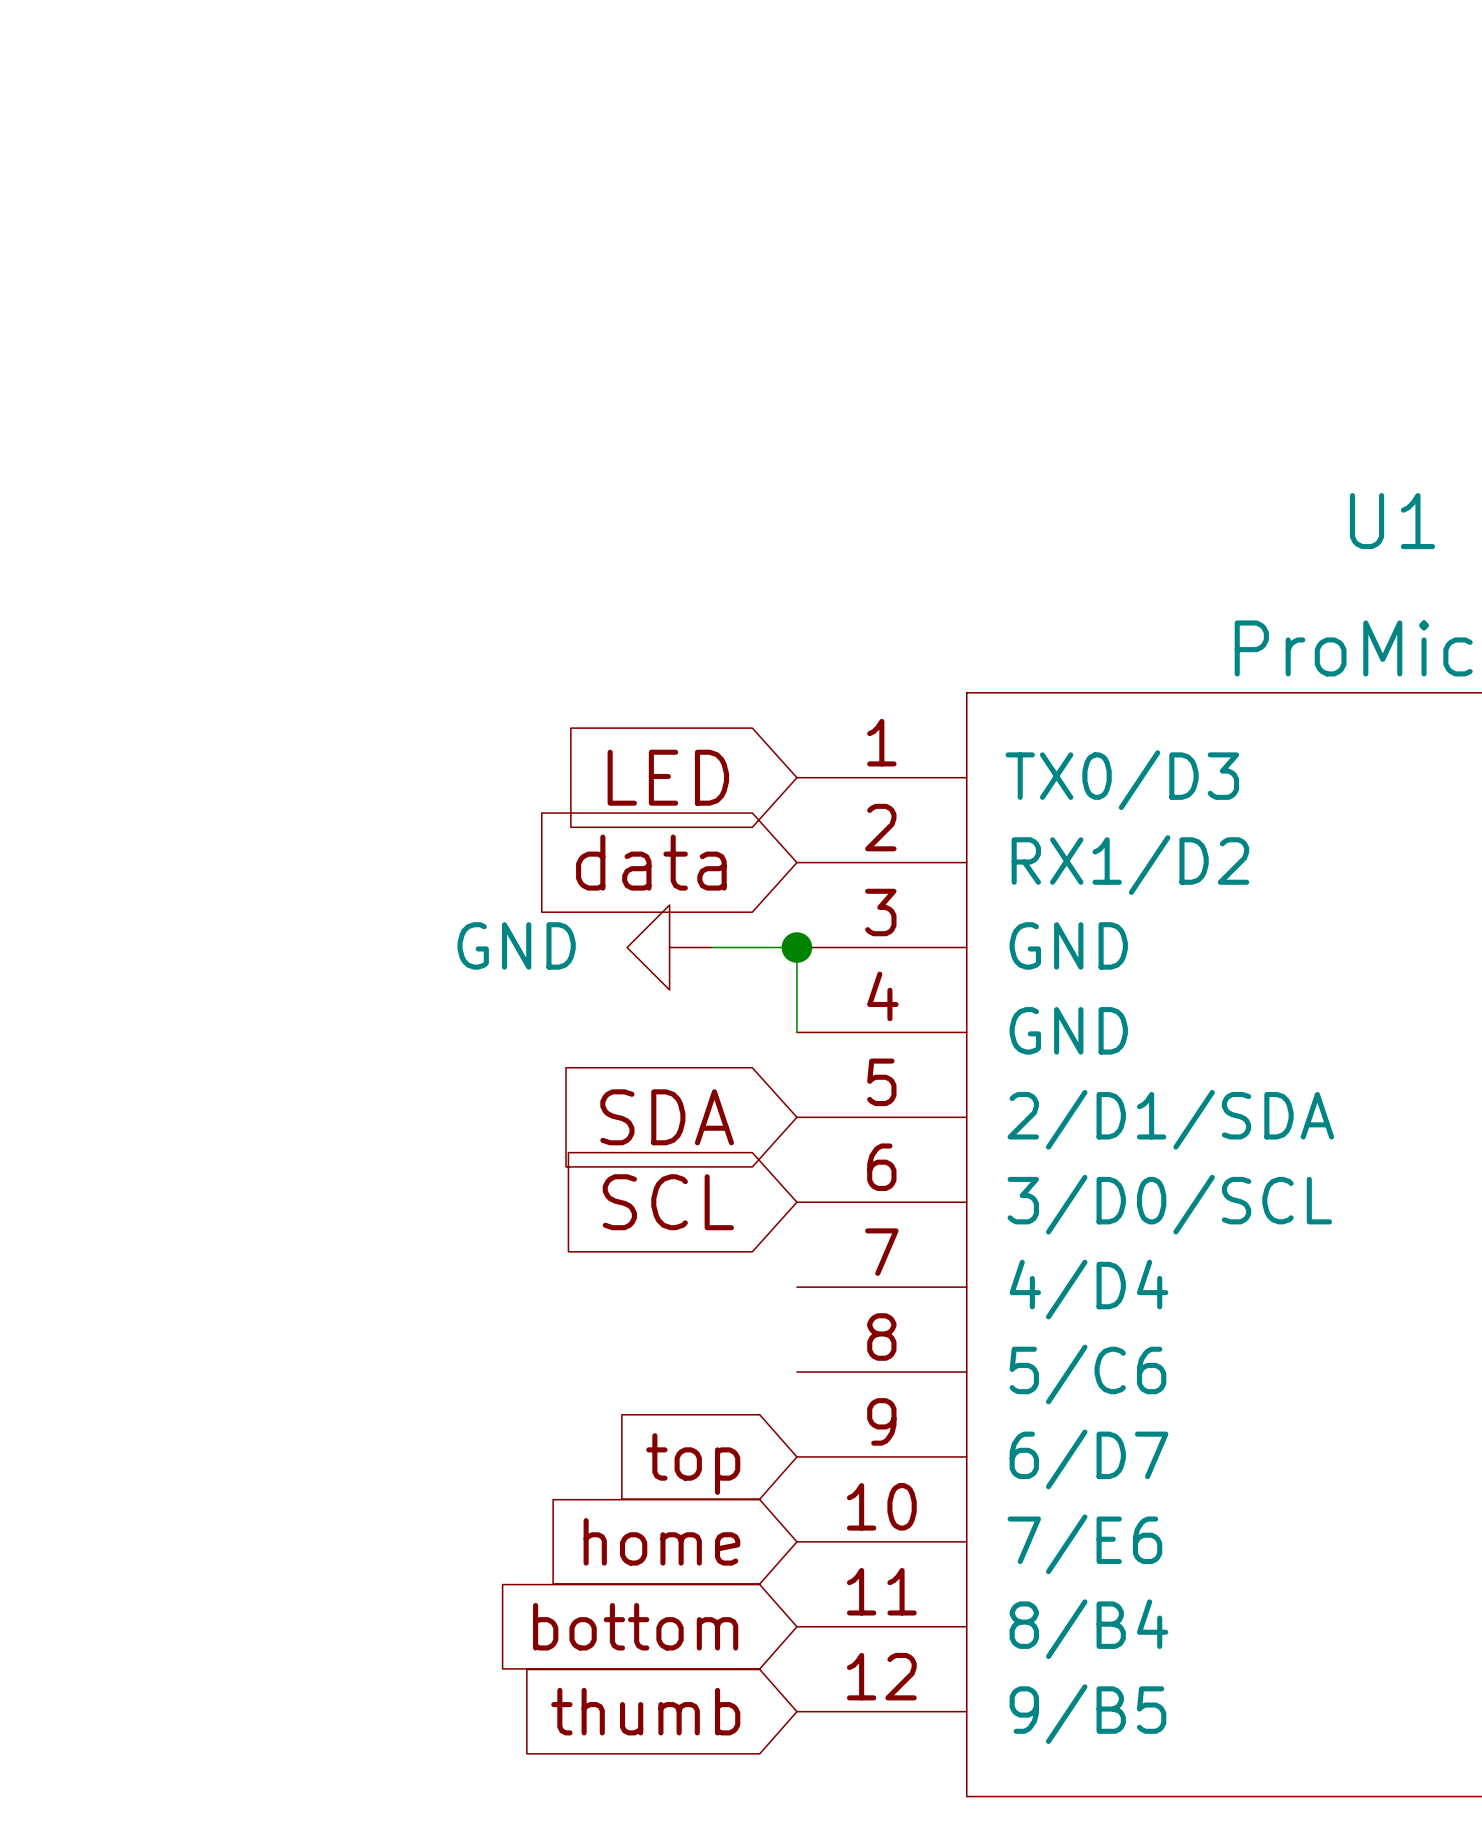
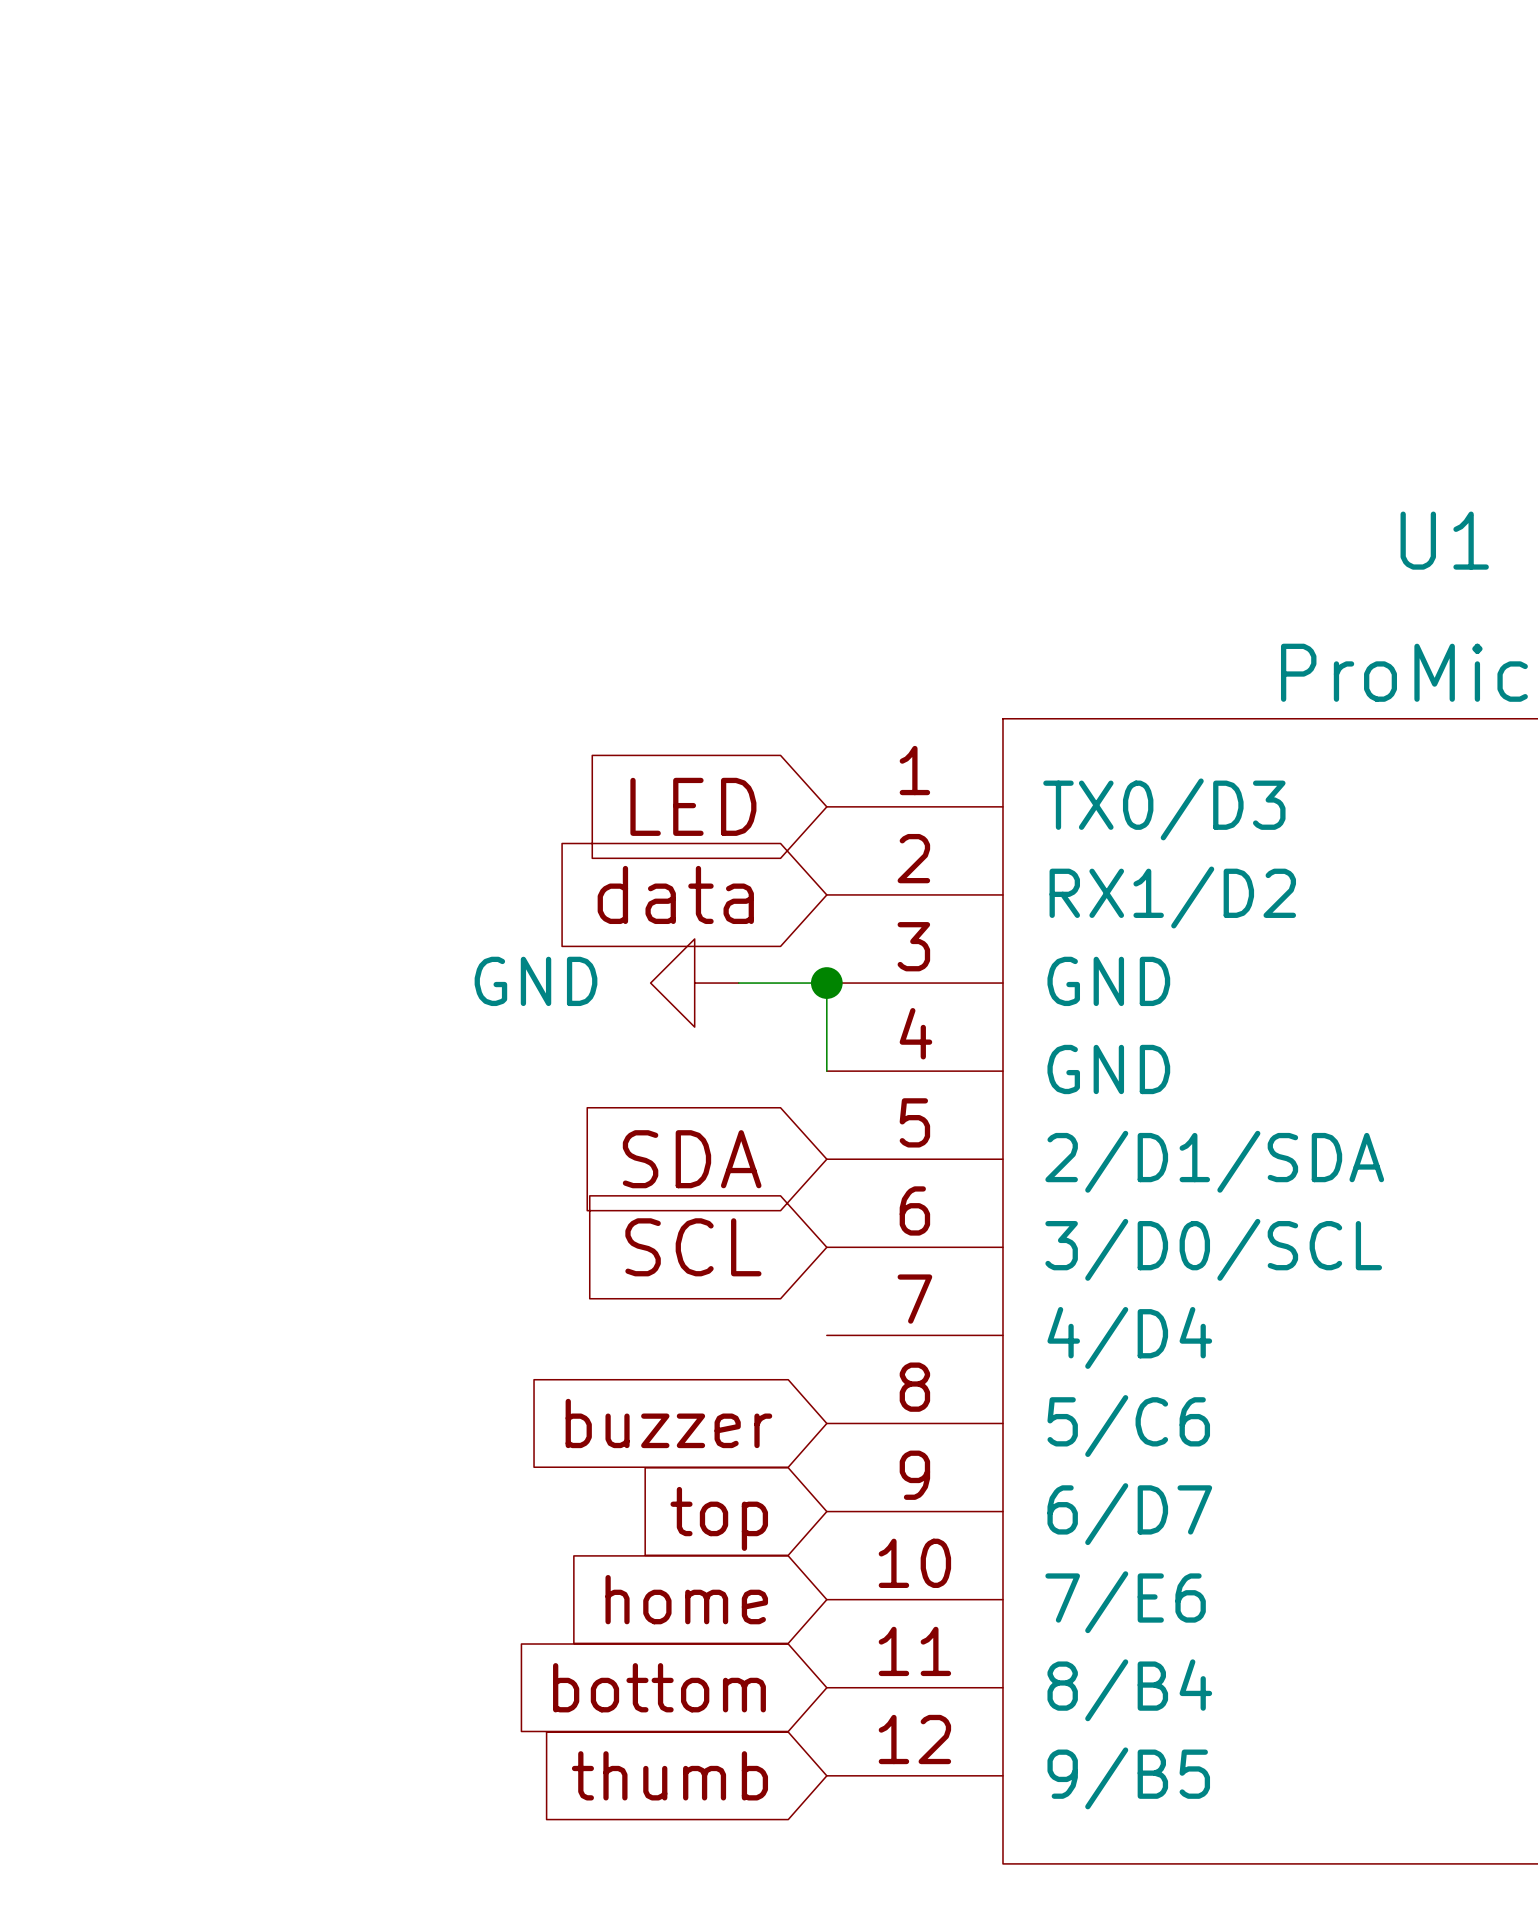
global label: none -> buzzer (668, 1423)

